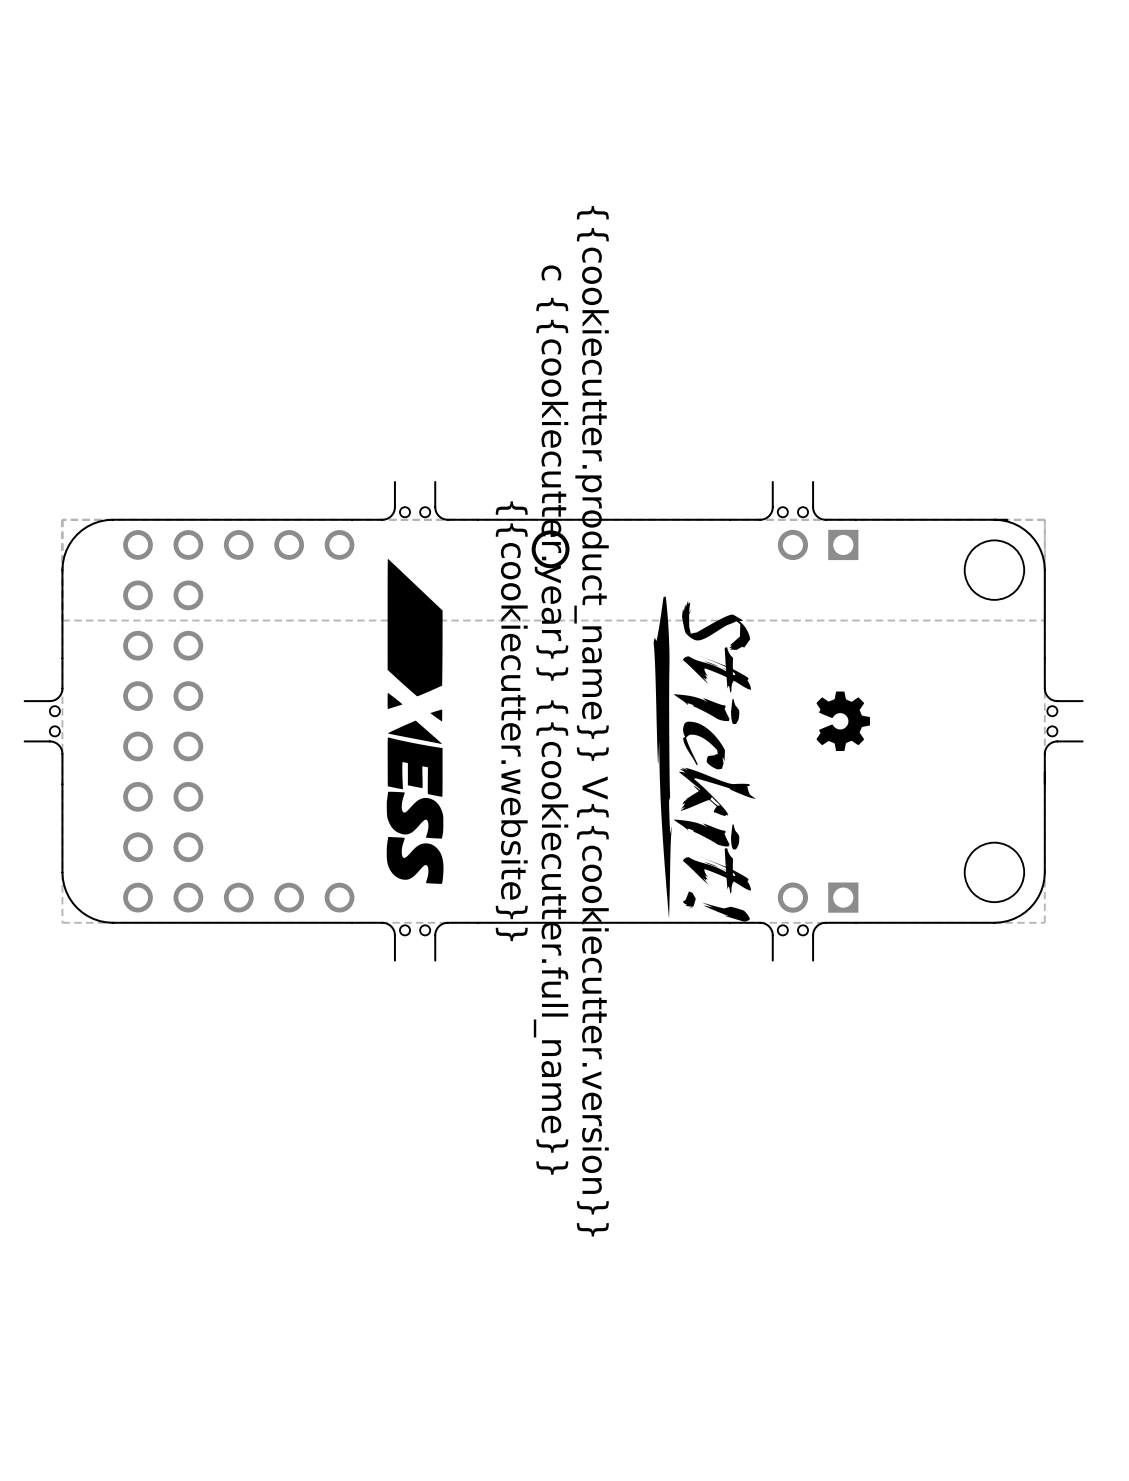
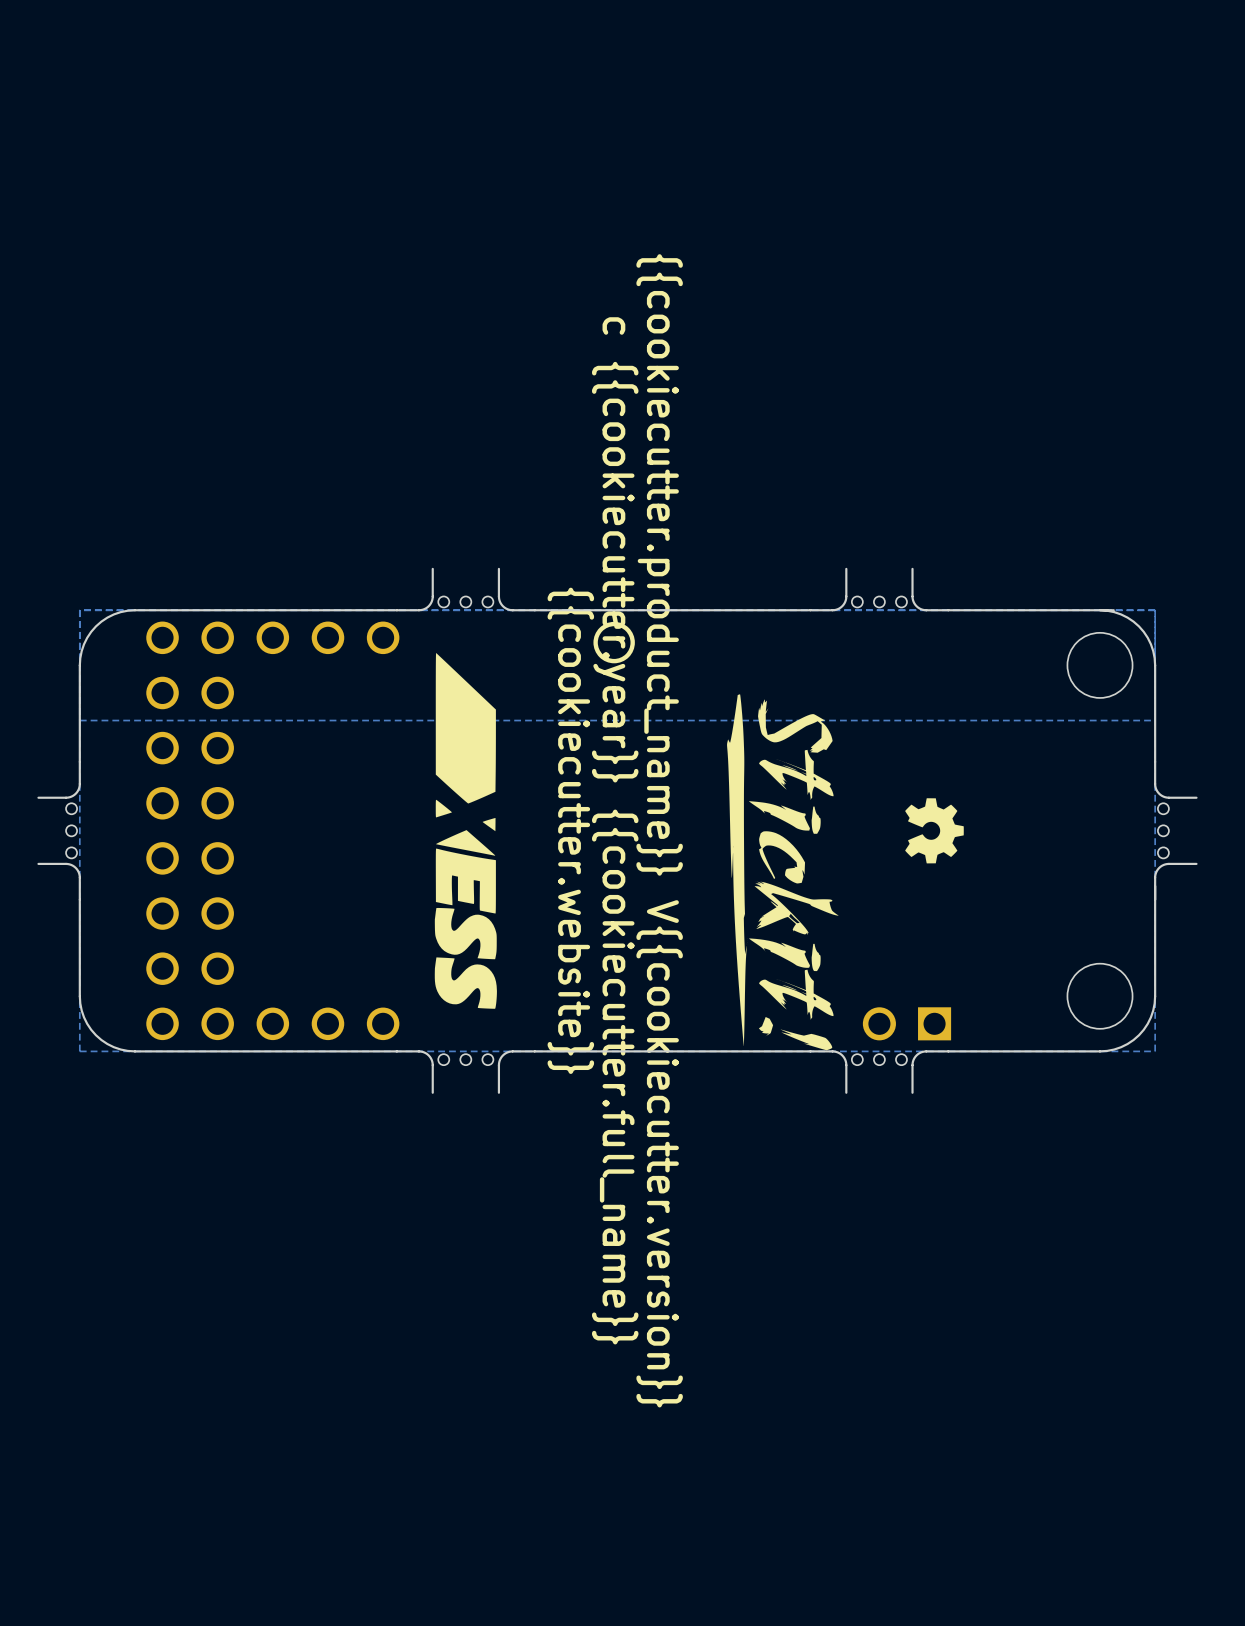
part footprint: [351, 480, 480, 521] -> [395, 567, 536, 612]
part footprint: [728, 480, 857, 521] -> [809, 567, 950, 612]
part: (818, 544) -> none
part footprint: [23, 657, 64, 786] -> [37, 760, 81, 901]
part footprint: [1043, 657, 1084, 786] -> [1154, 760, 1198, 901]
part footprint: [351, 921, 480, 962] -> [395, 1050, 536, 1094]
part footprint: [728, 921, 857, 962] -> [809, 1050, 950, 1094]

